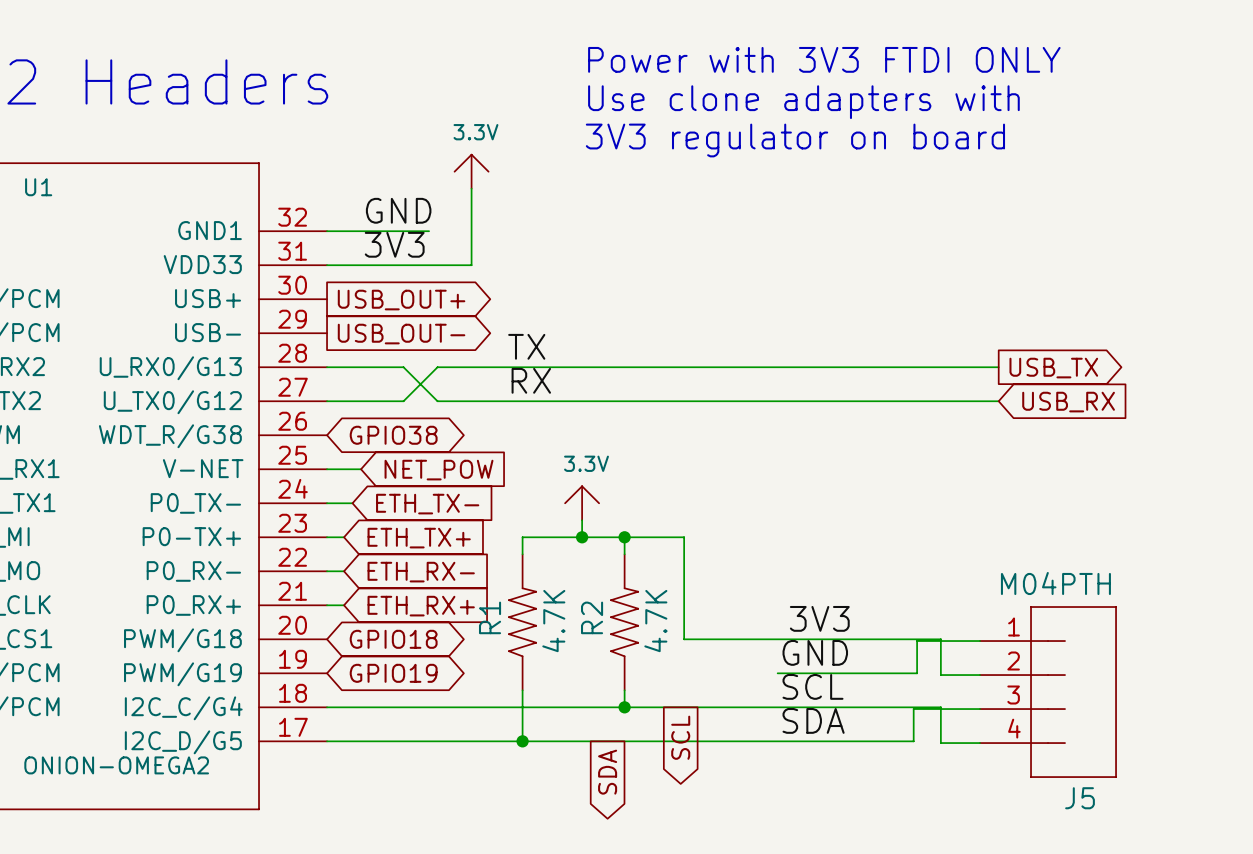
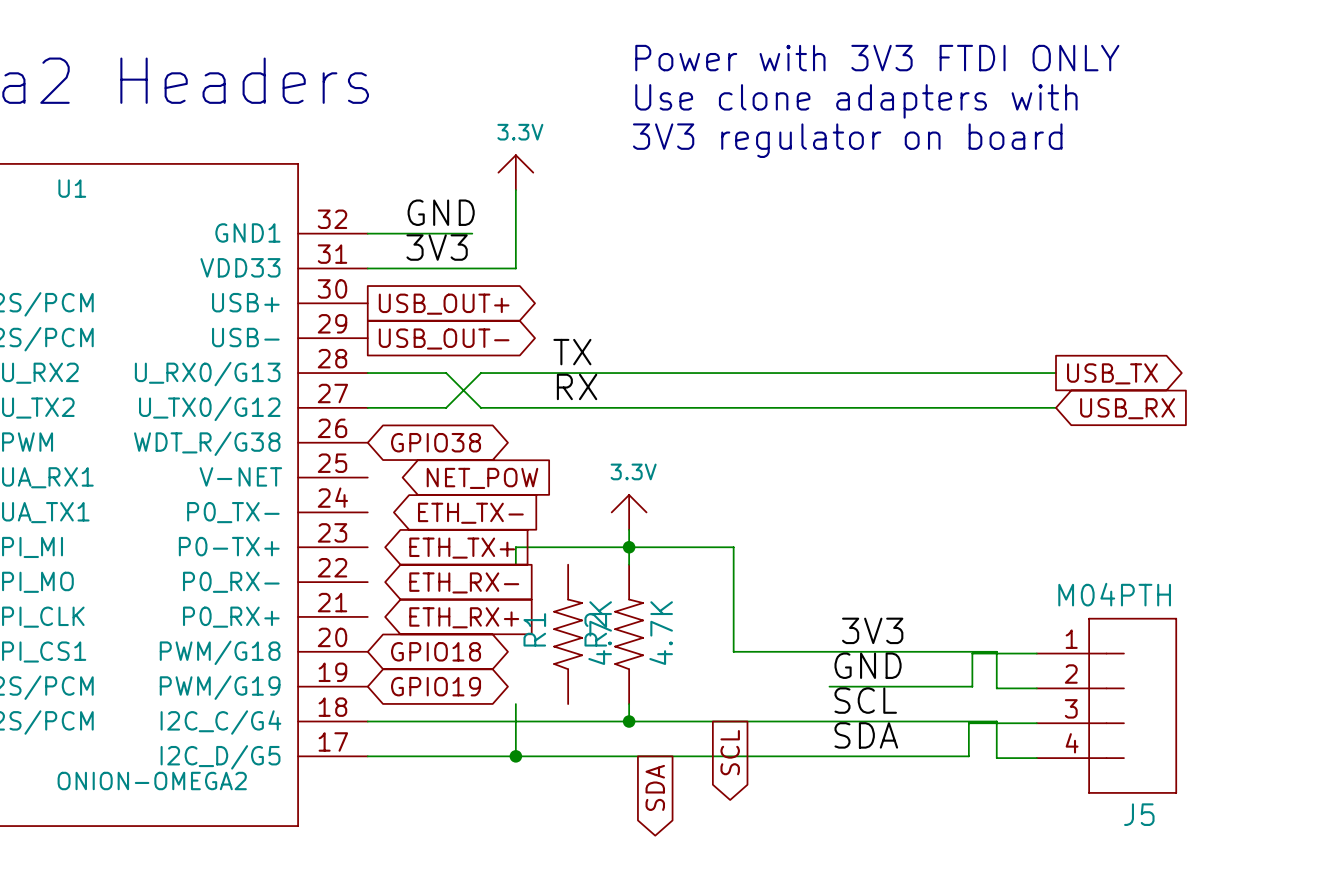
wire: (327, 469) (361, 469) -> none
wire: (327, 503) (352, 503) -> none
wire: (327, 537) (344, 537) -> none
wire: (522, 537) (522, 554) -> (568, 547) (515, 547) (515, 564)
wire: (624, 537) (624, 554) -> (629, 547) (629, 564)
junction: (624, 537) -> none
wire: (327, 571) (344, 571) -> none
wire: (327, 605) (344, 605) -> none
R2 position: (624, 622) -> (629, 634)
wire: (522, 690) (522, 741) -> (515, 704) (515, 756)
wire: (624, 690) (624, 707) -> (629, 704) (629, 721)
junction: none -> (629, 721)
junction: (624, 707) -> none
junction: none -> (515, 756)
junction: (522, 741) -> none

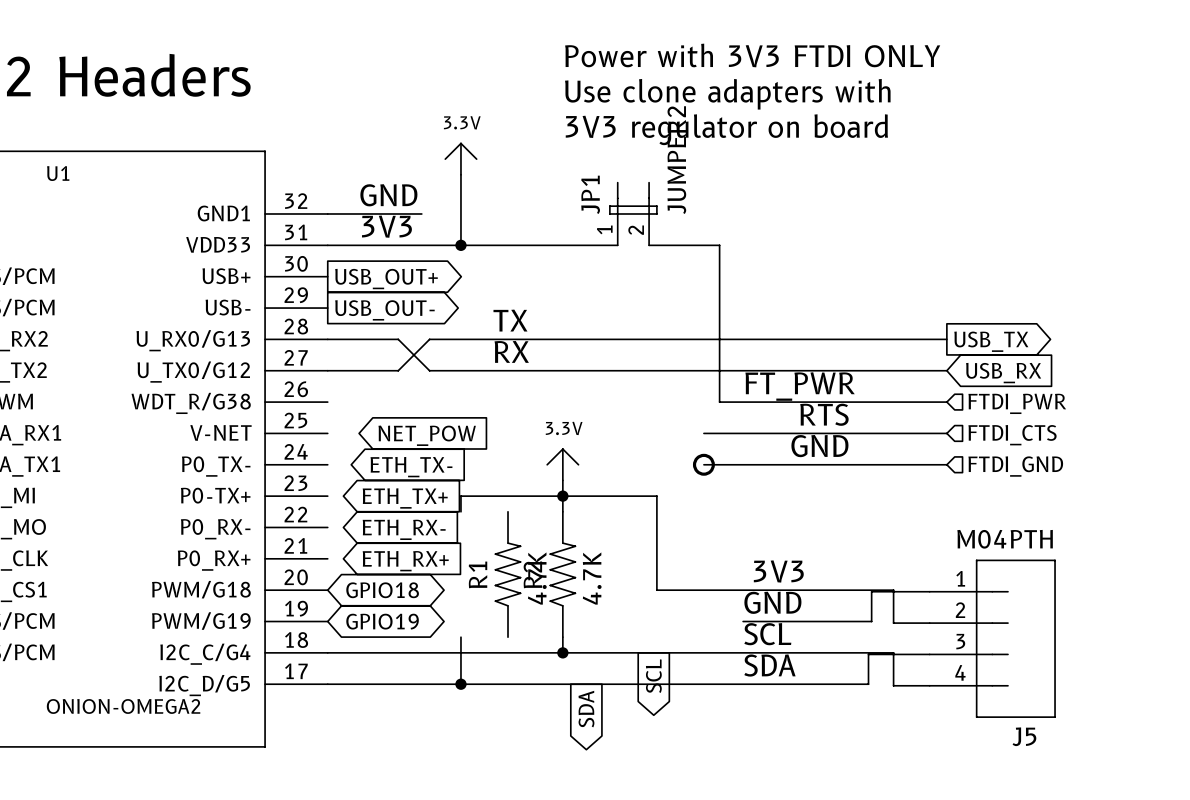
JP1: none -> JUMPER2 (633, 213)
wire: none -> (460, 245) (617, 245)
junction: none -> (460, 245)
wire: none -> (649, 245) (719, 245) (719, 402) (946, 402)
label: none -> FT_PWR (800, 386)
global label: GPIO38 (436, 442) -> none
hierarchical label: none -> FTDI_PWR (1017, 403)
label: none -> RTS (824, 414)
wire: none -> (703, 433) (946, 433)
hierarchical label: none -> FTDI_CTS (1012, 435)
label: none -> GND (819, 446)
wire: none -> (703, 464) (946, 464)
part: none -> (703, 464)
hierarchical label: none -> FTDI_GND (1015, 466)

